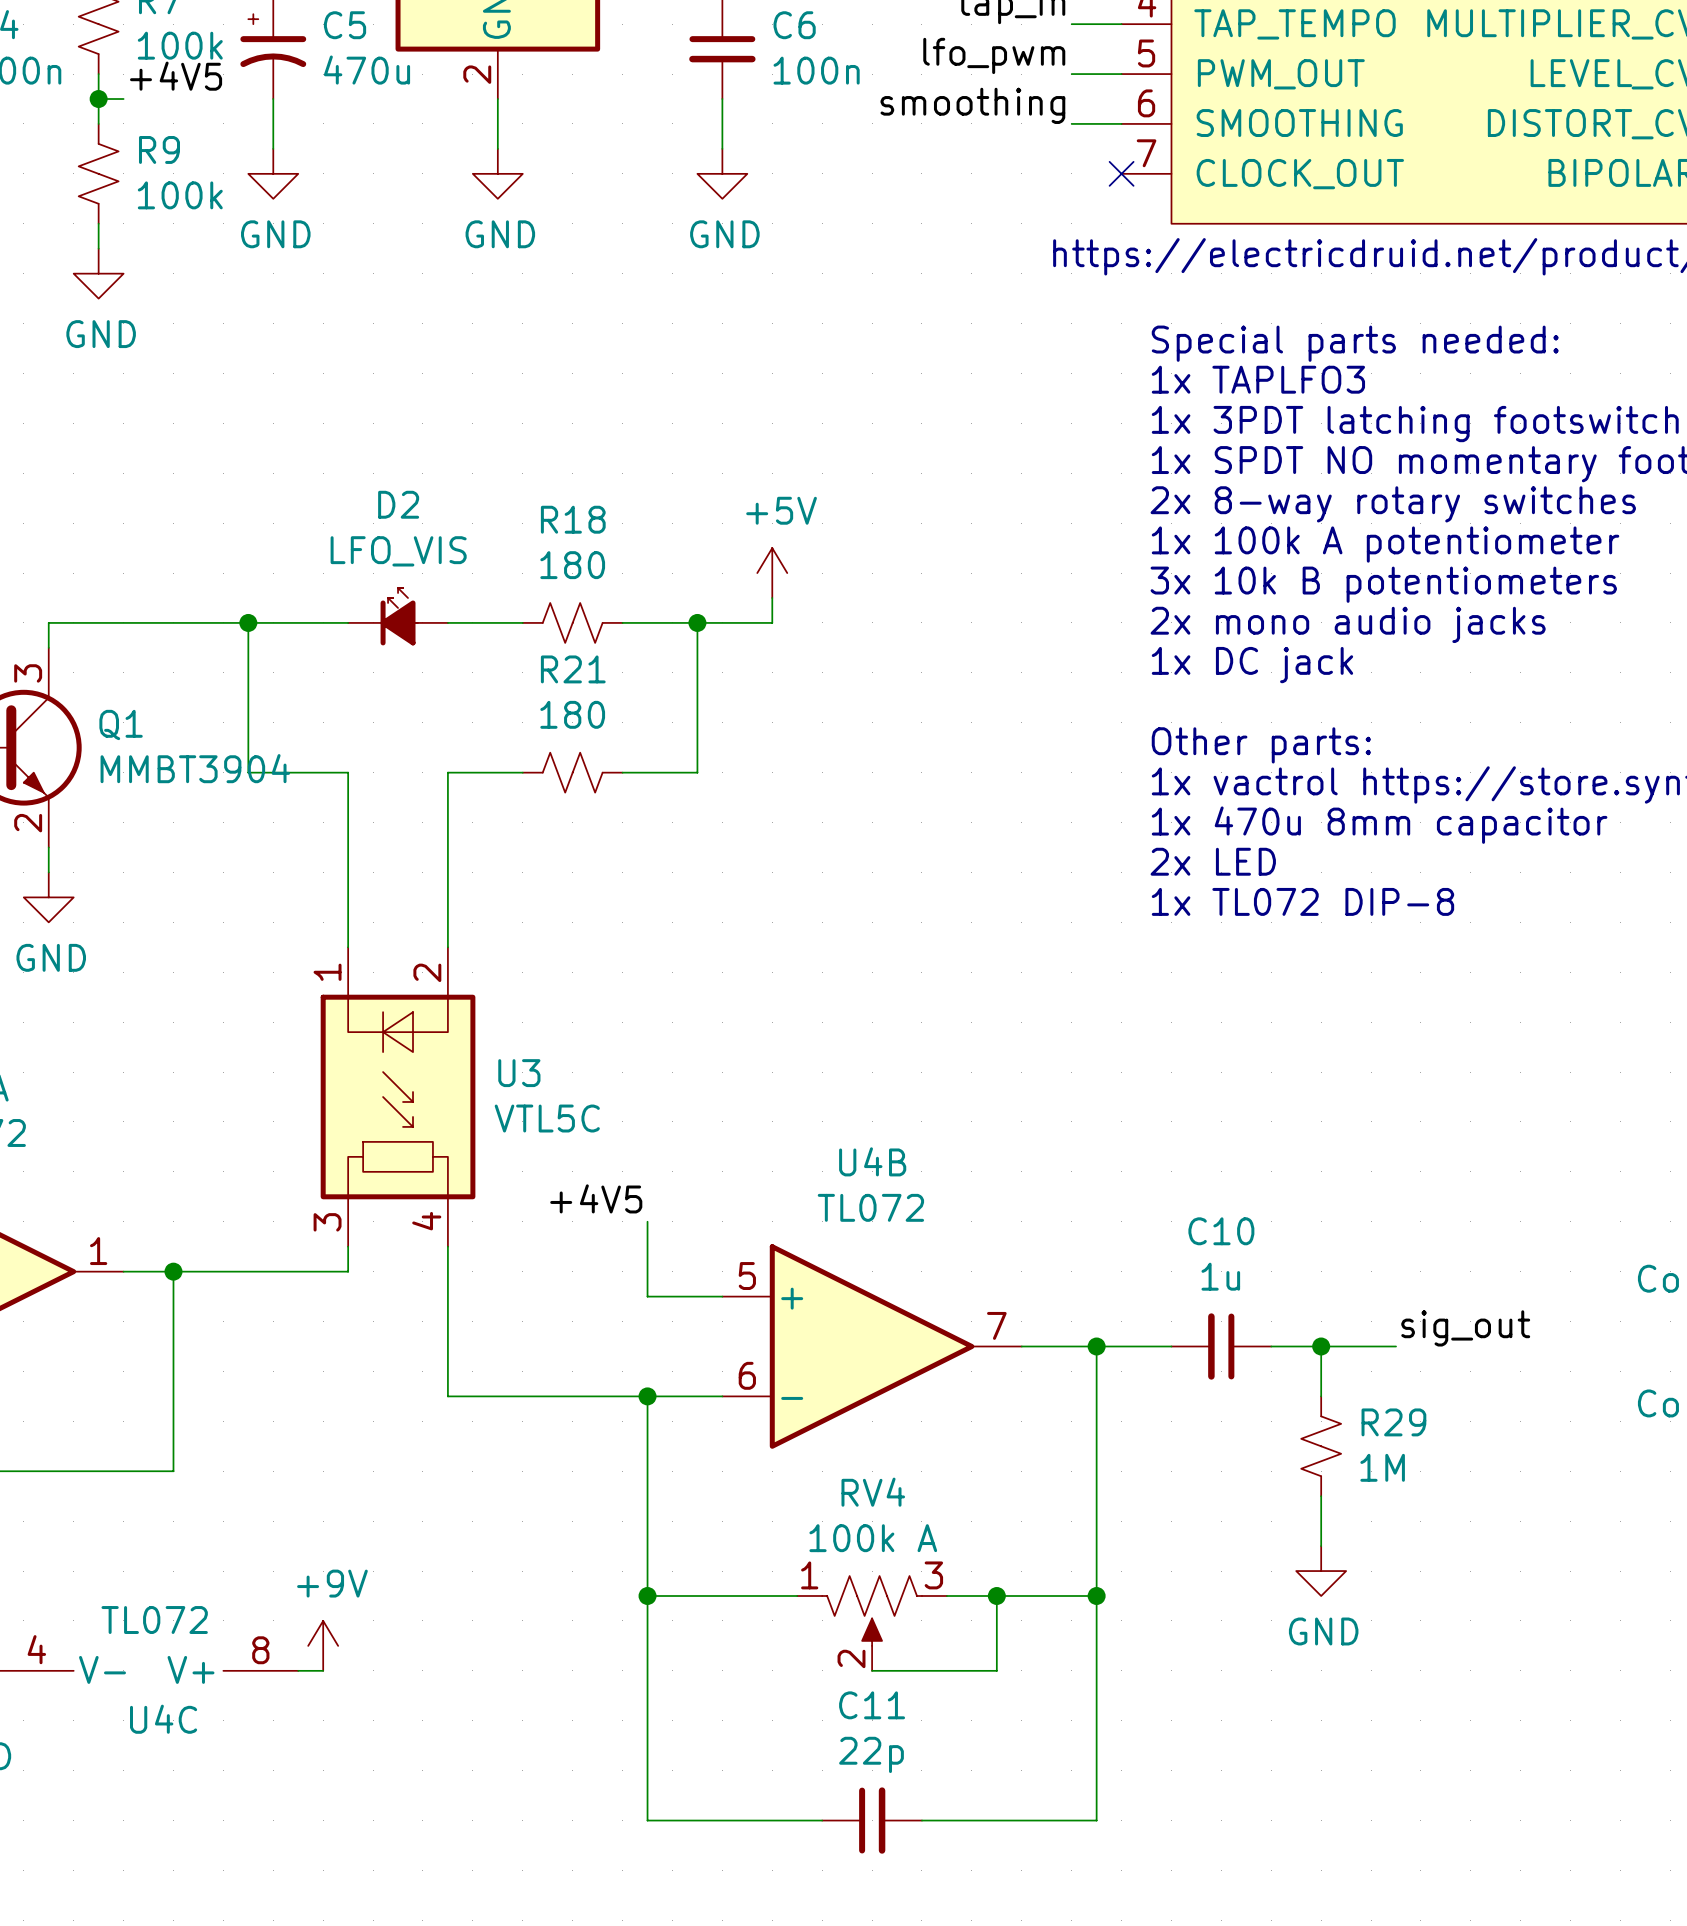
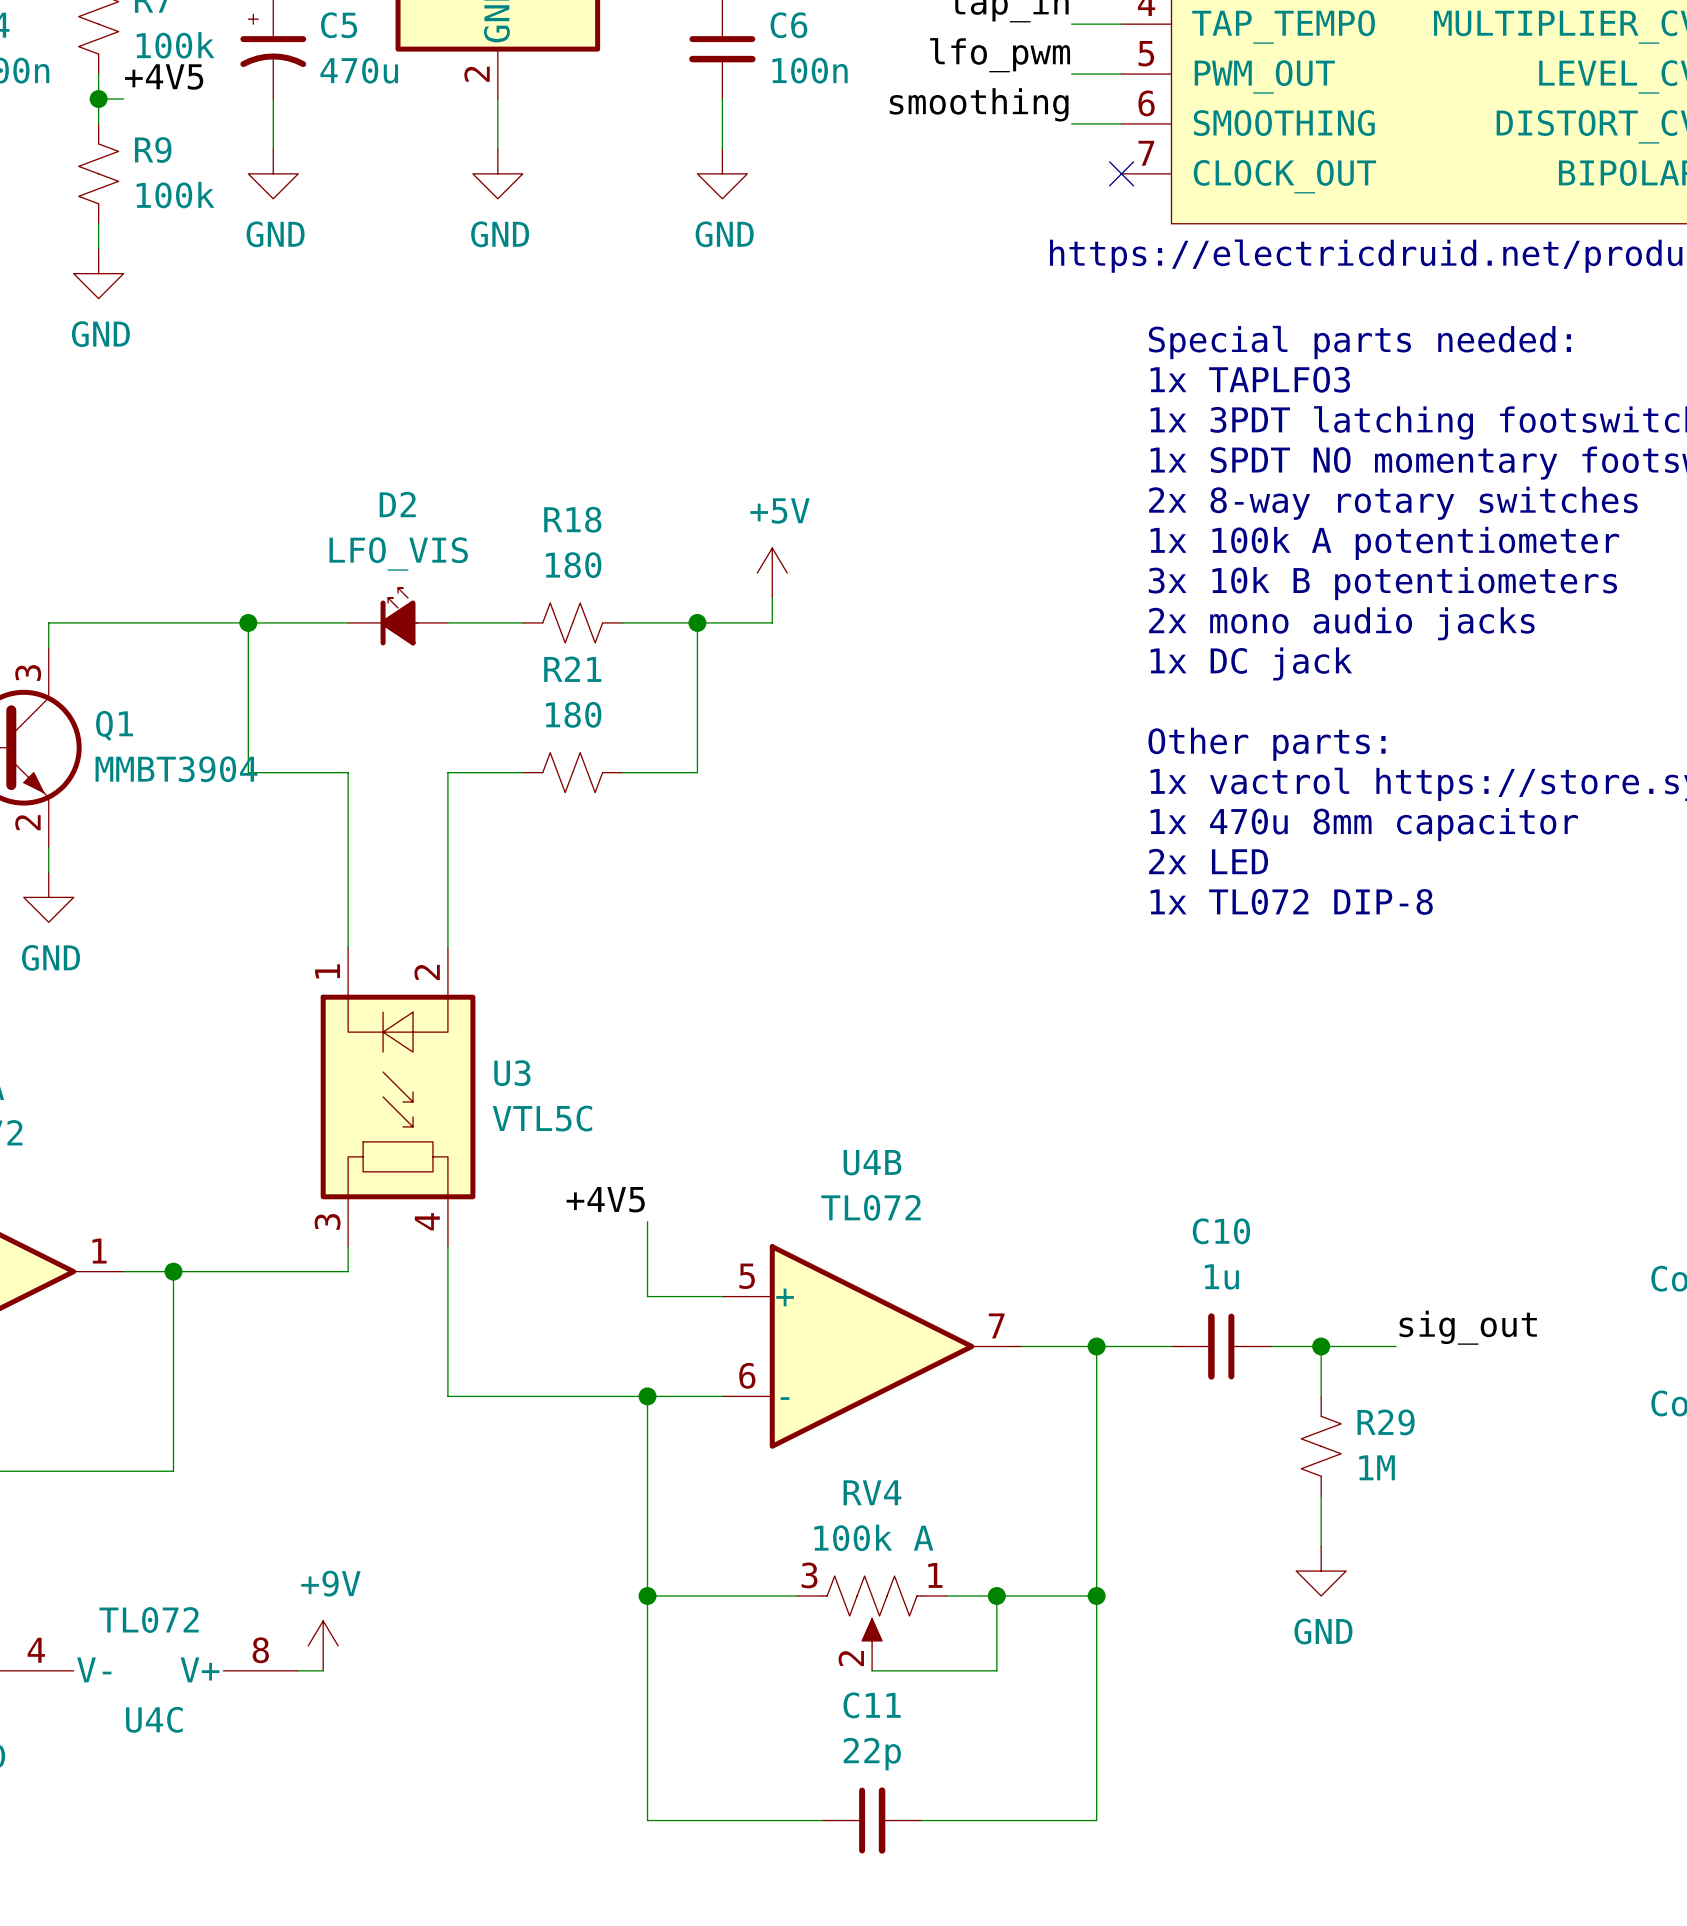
RV4 flip: as is (872, 1610) -> left-right (872, 1610)

